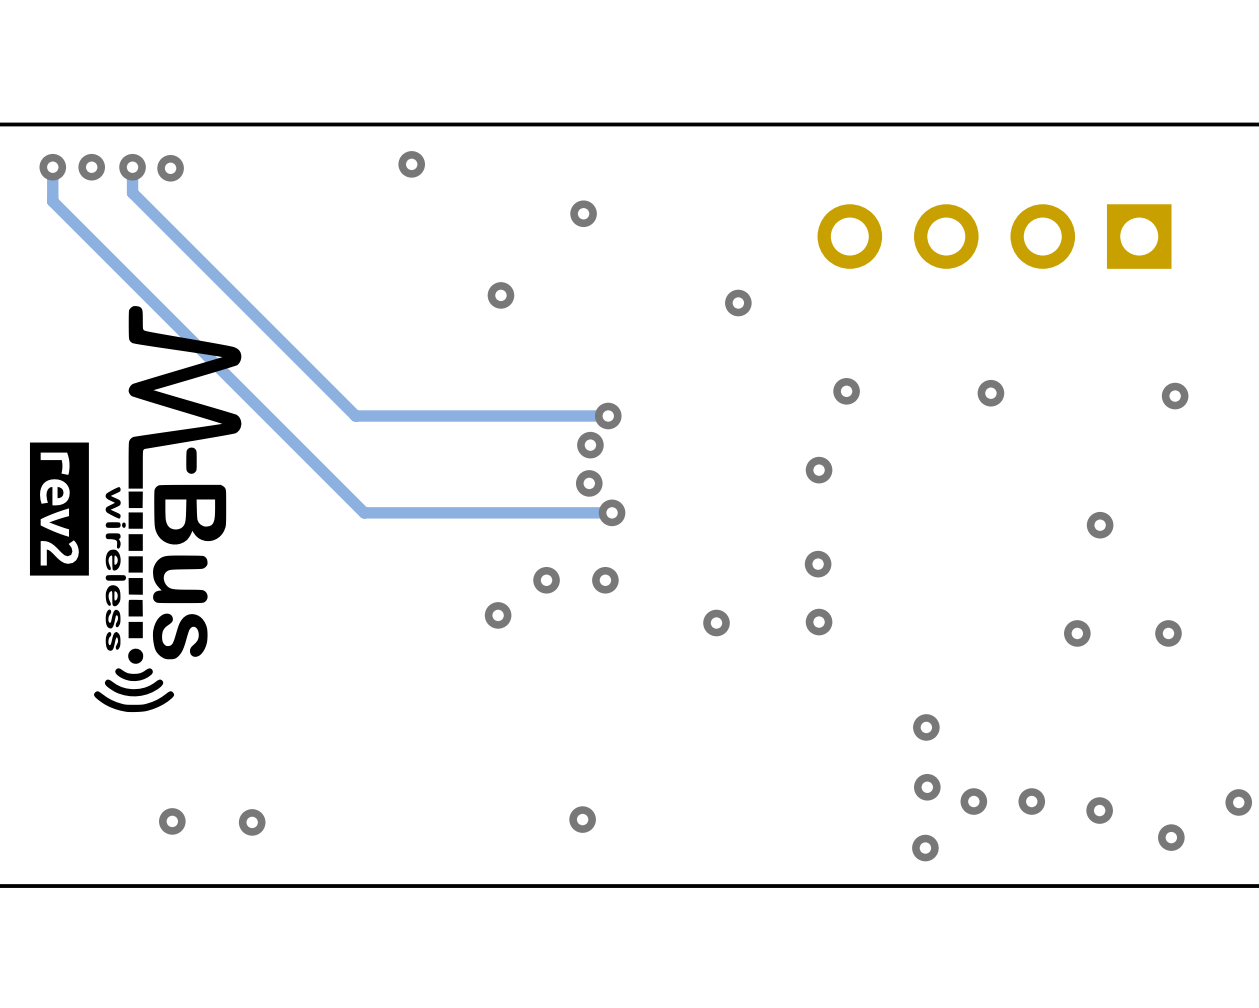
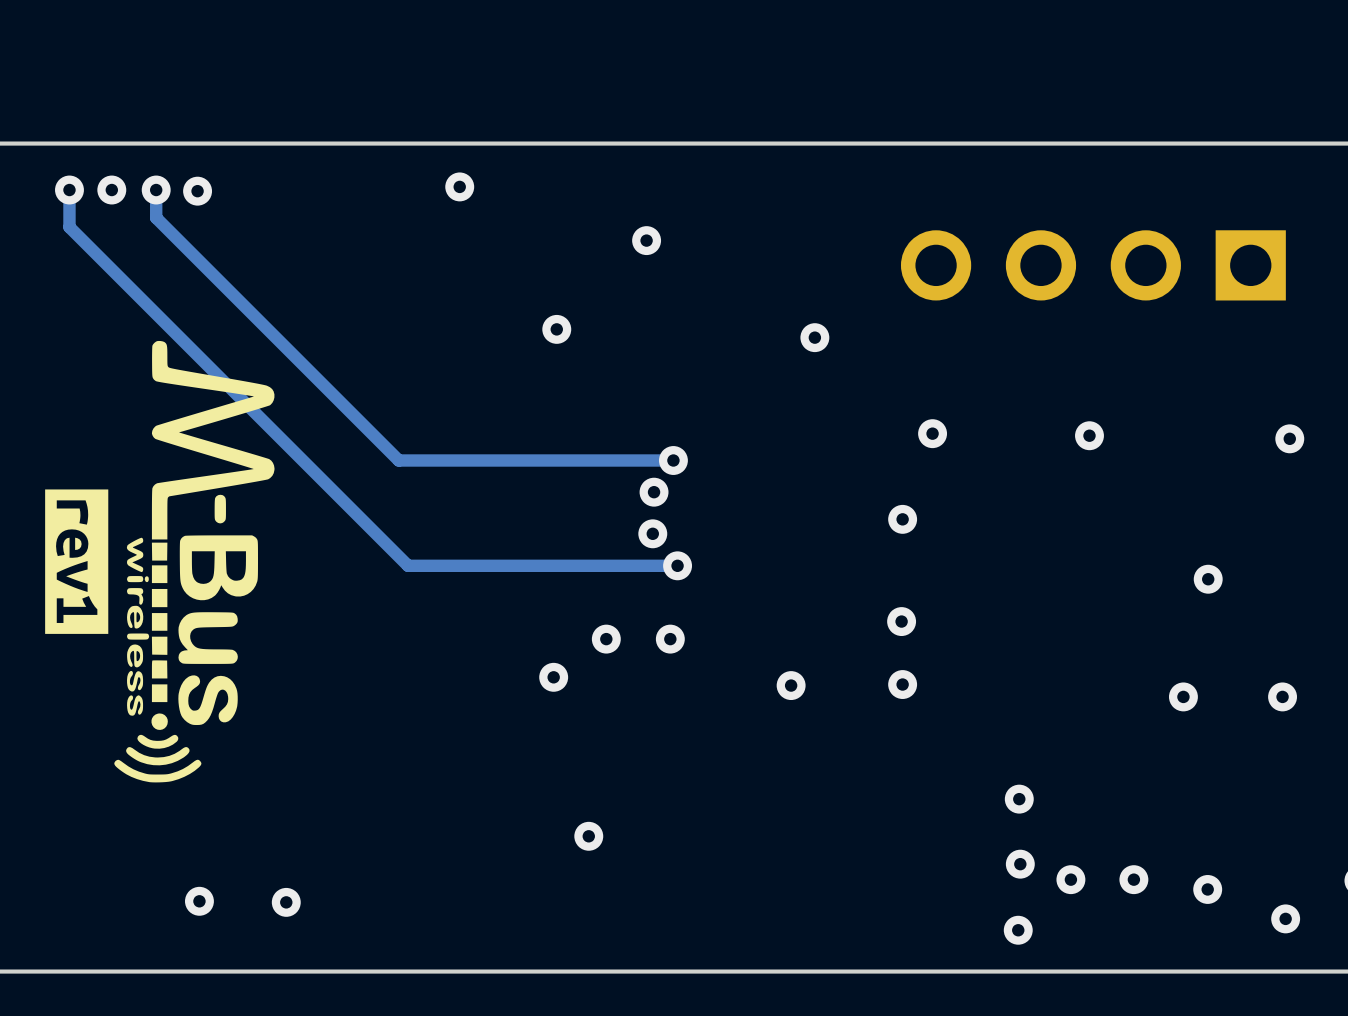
drawing shape: [29, 442, 89, 576] -> [45, 489, 109, 634]
via position: (582, 819) -> (588, 836)

